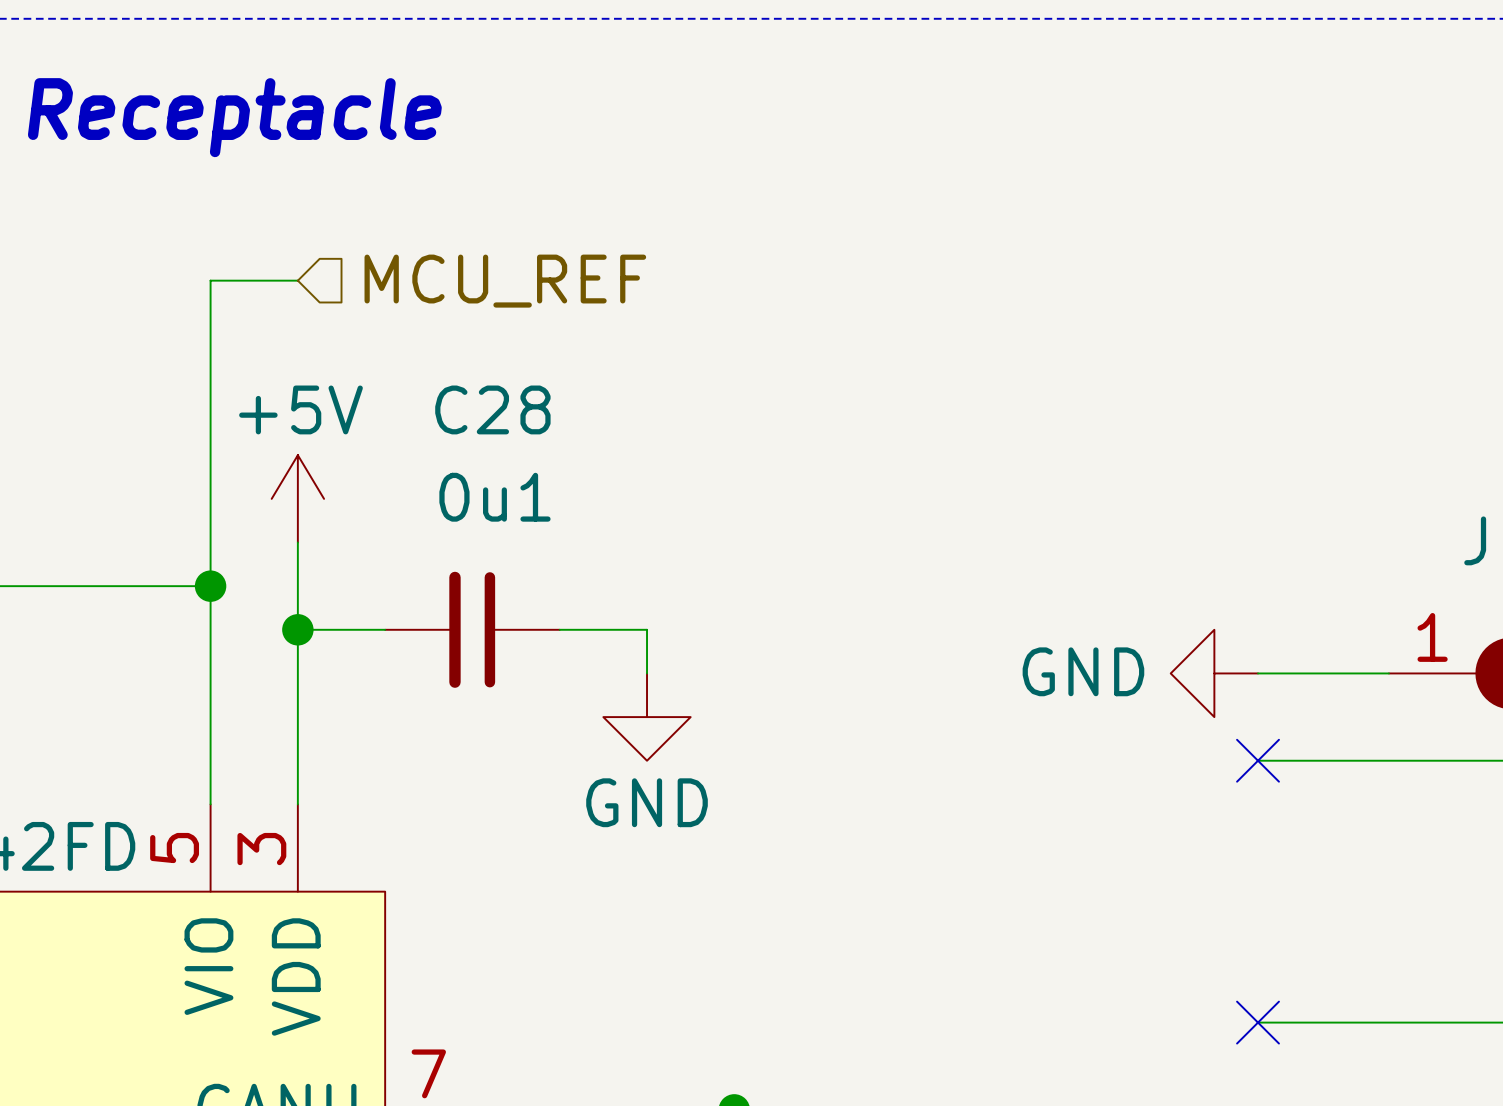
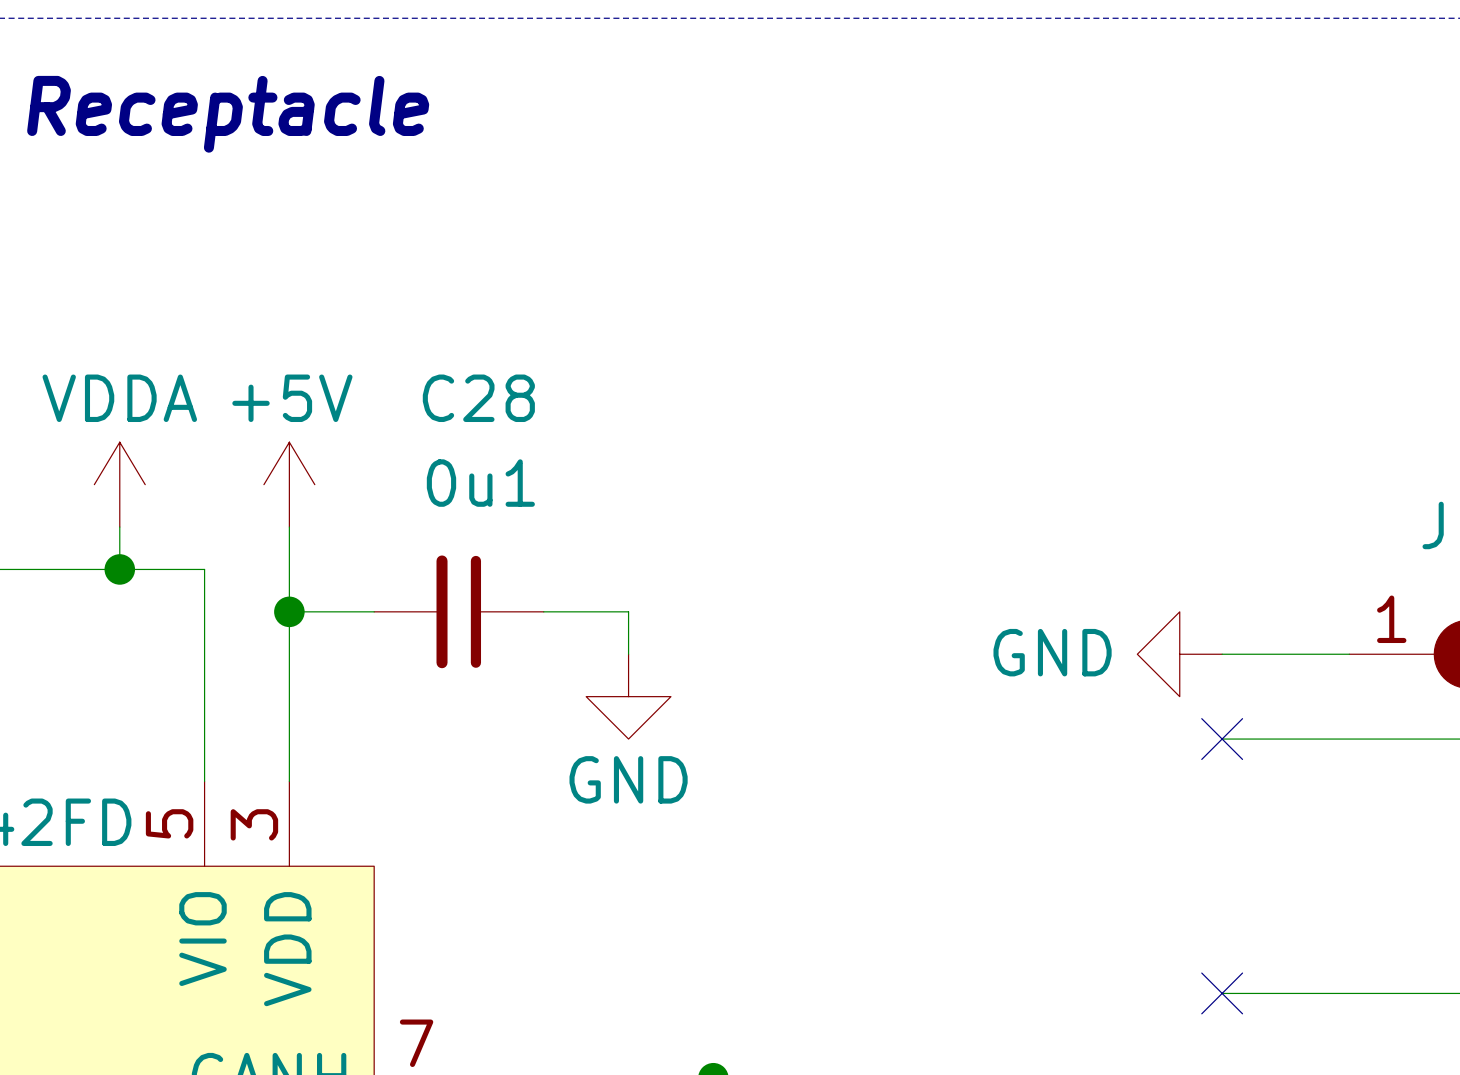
wire: (297, 280) (210, 280) (210, 586) -> none
hierarchical label: MCU_REF (505, 281) -> none
power symbol: none -> VDDA (119, 484)
wire: none -> (119, 527) (119, 569)
junction position: (210, 586) -> (119, 569)

